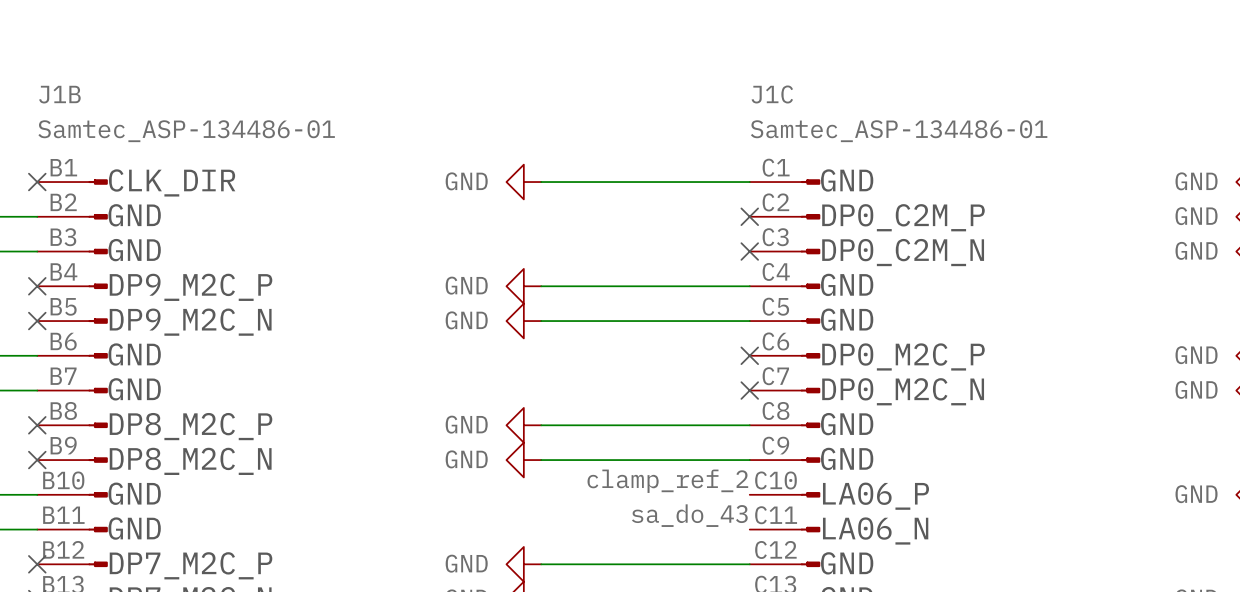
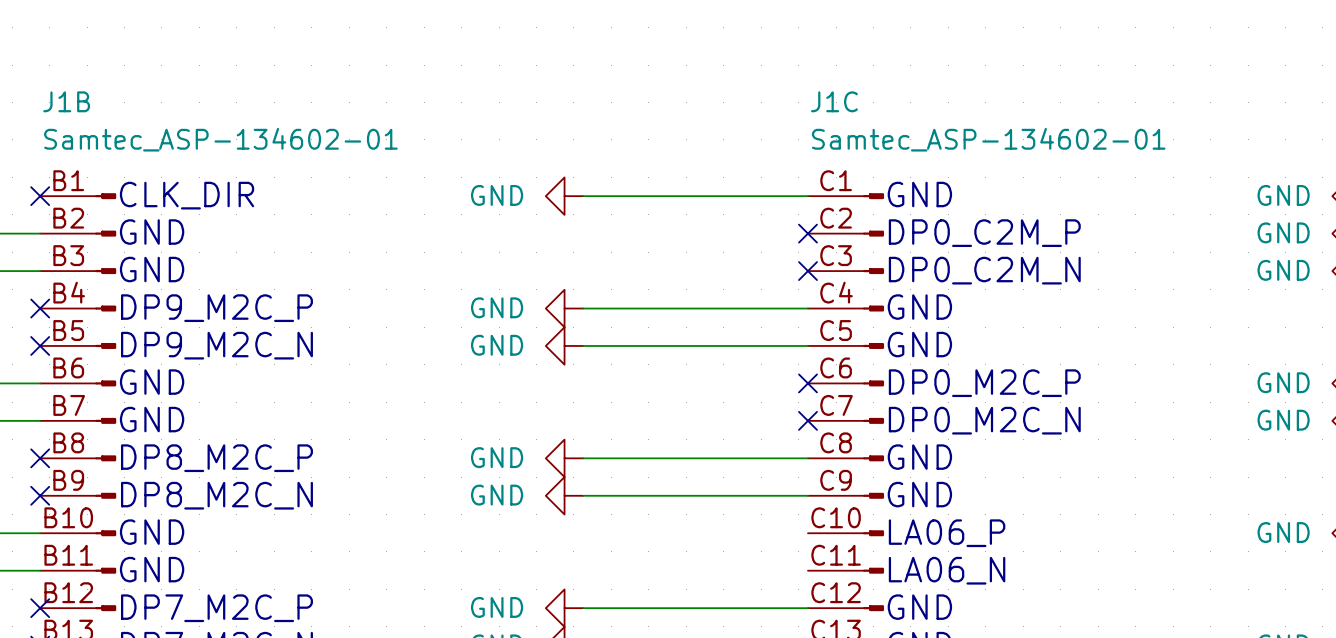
J1B value: Samtec_ASP-134486-01 (186, 131) -> Samtec_ASP-134602-01 (220, 139)
J1C value: Samtec_ASP-134486-01 (899, 131) -> Samtec_ASP-134602-01 (988, 139)
label: clamp_ref_2 (667, 481) -> none
label: sa_do_43 (689, 515) -> none

